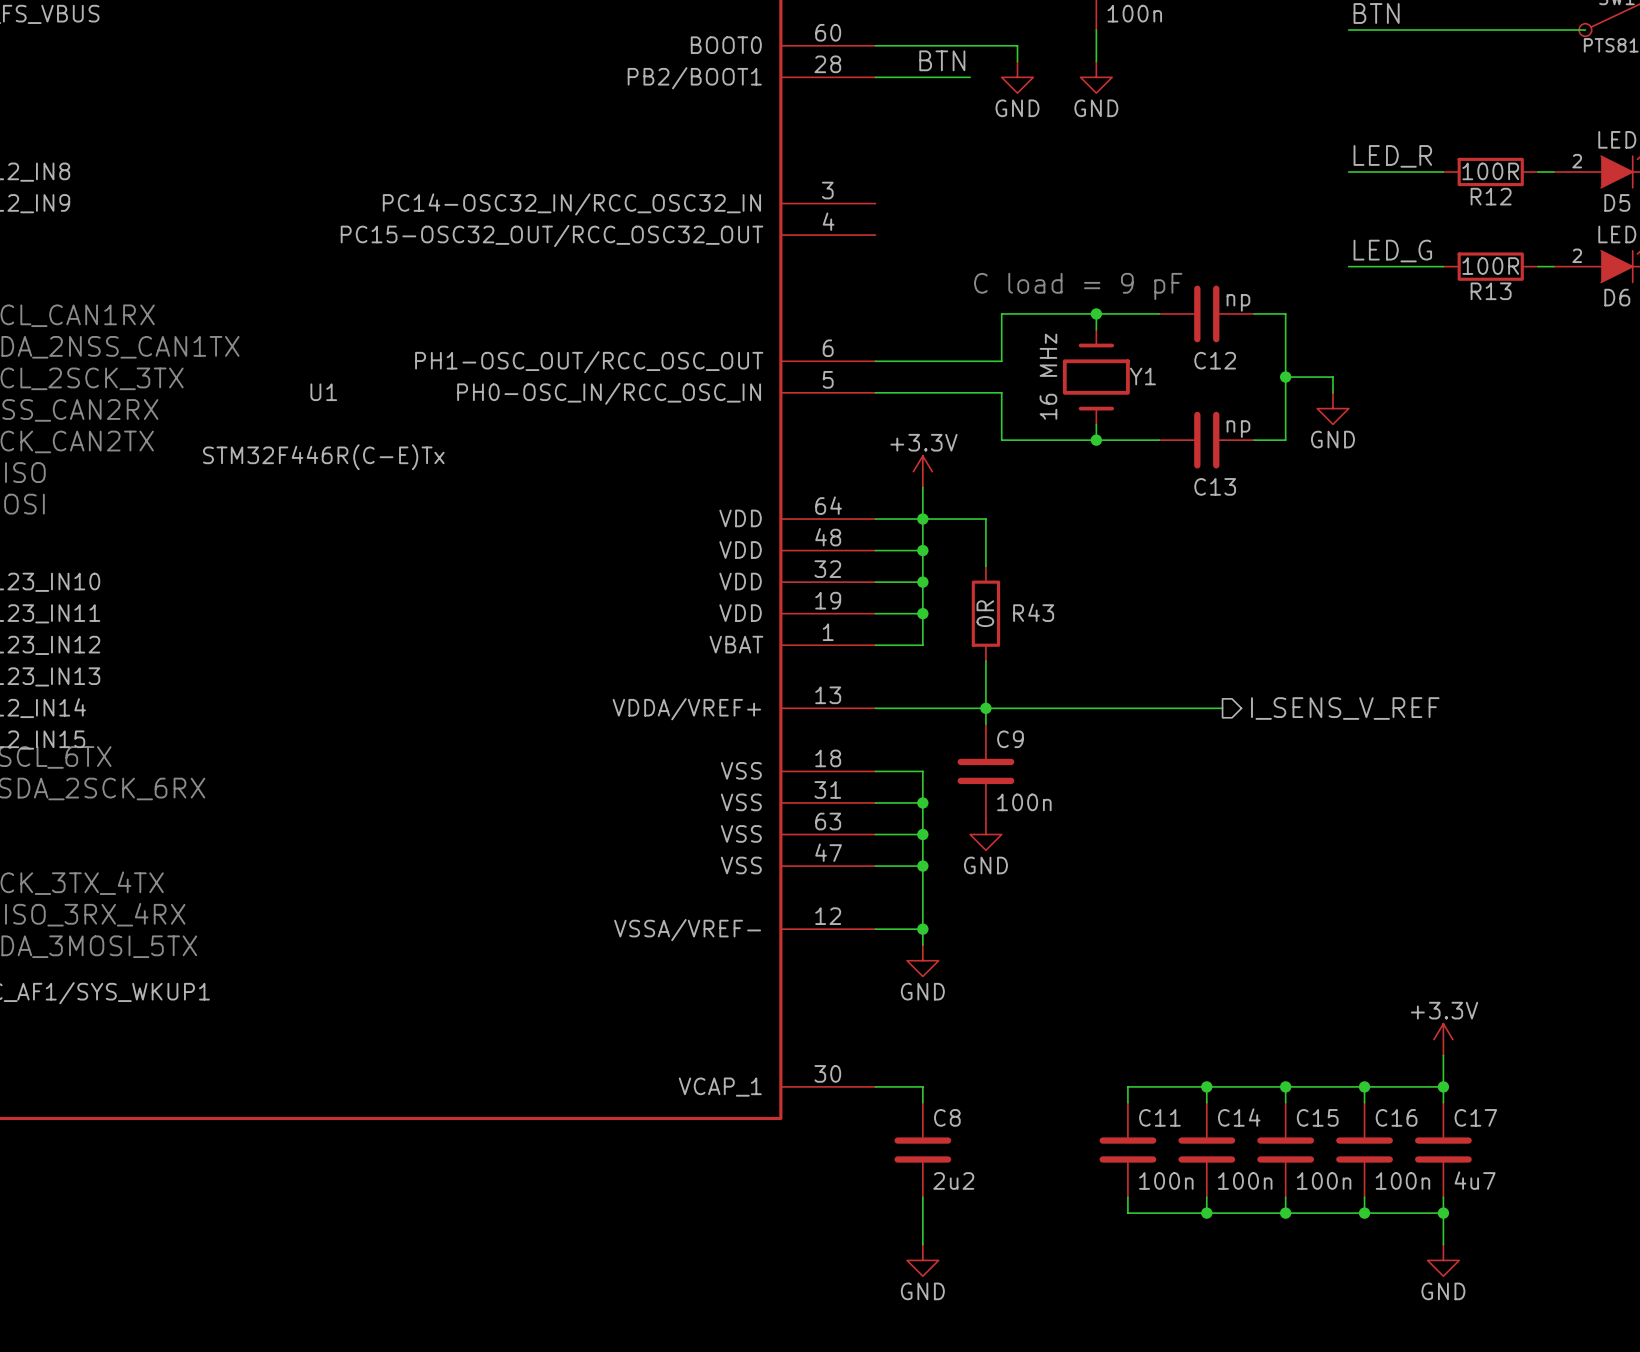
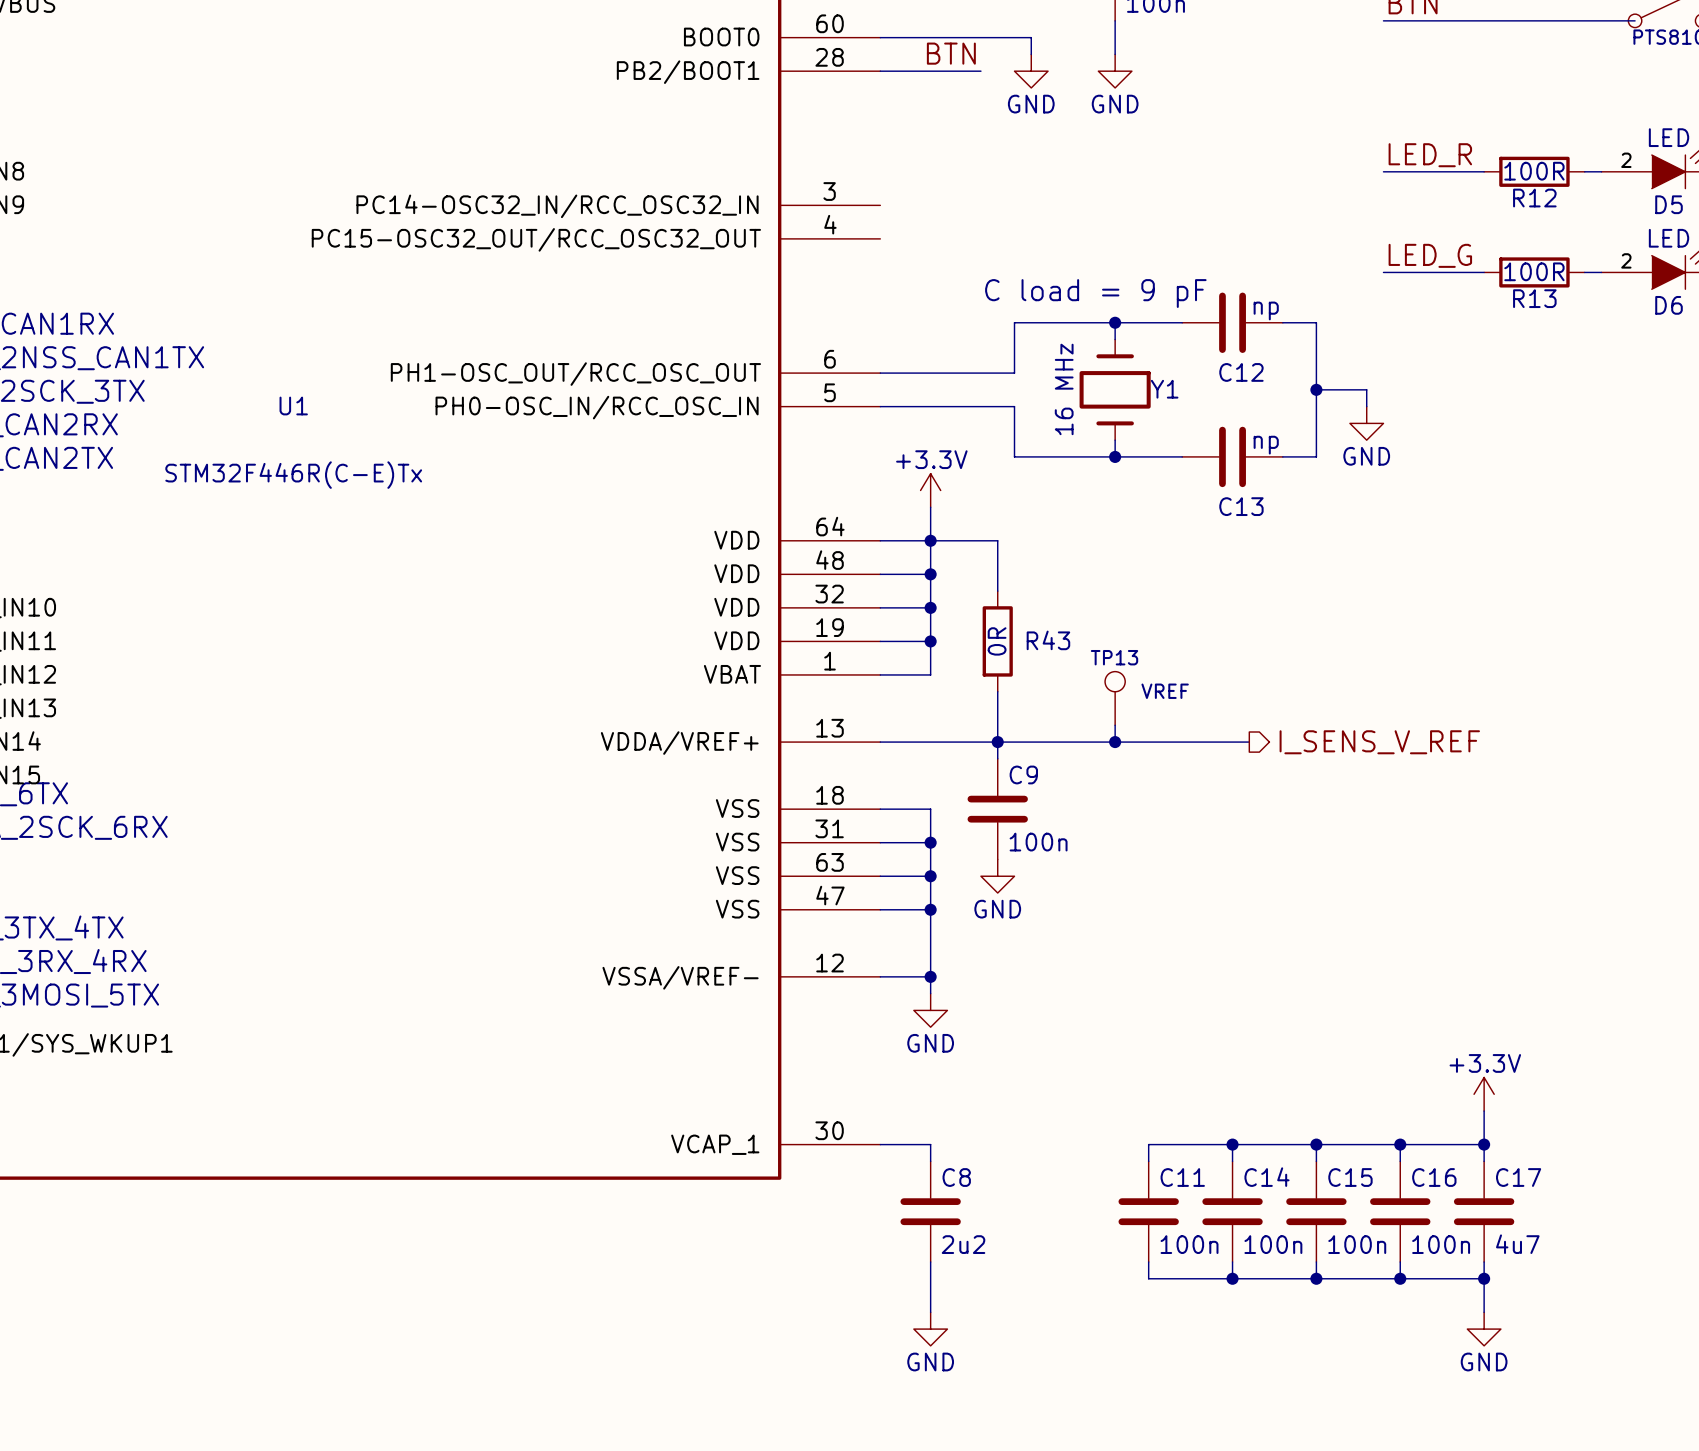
TP13: none -> VREF (1115, 698)
wire: none -> (1115, 725) (1115, 742)
junction: none -> (1115, 742)

